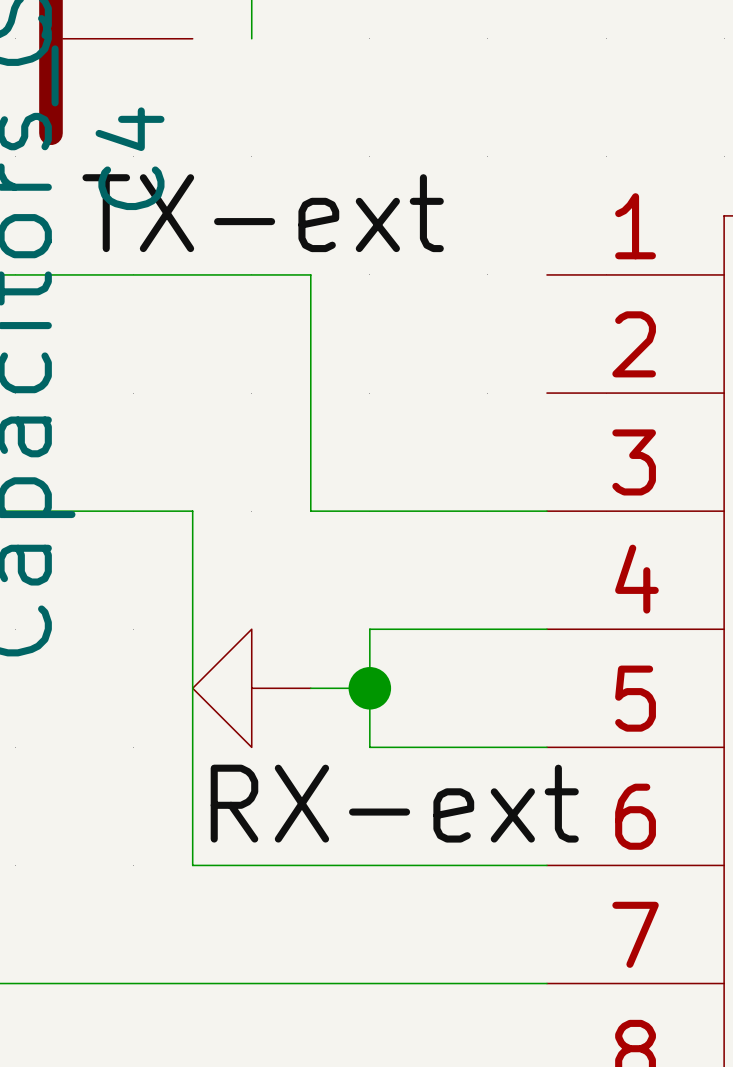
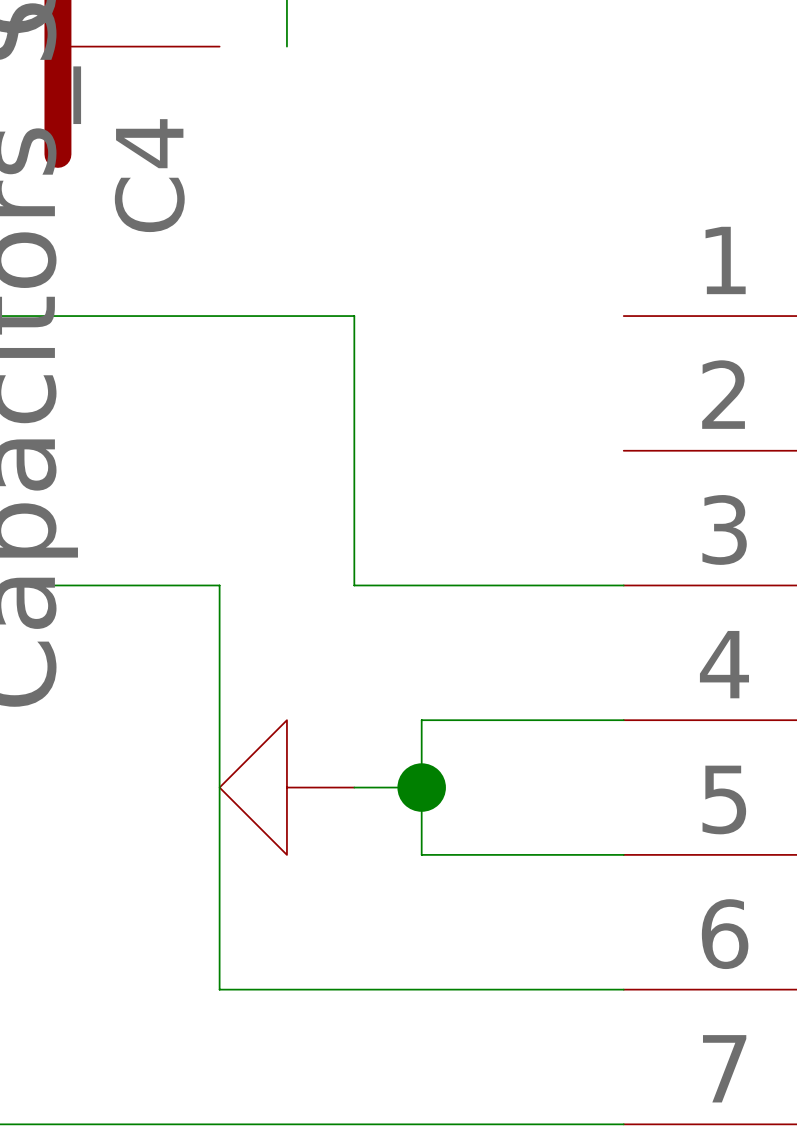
label: TX-ext (263, 213) -> none
label: RX-ext (394, 803) -> none

